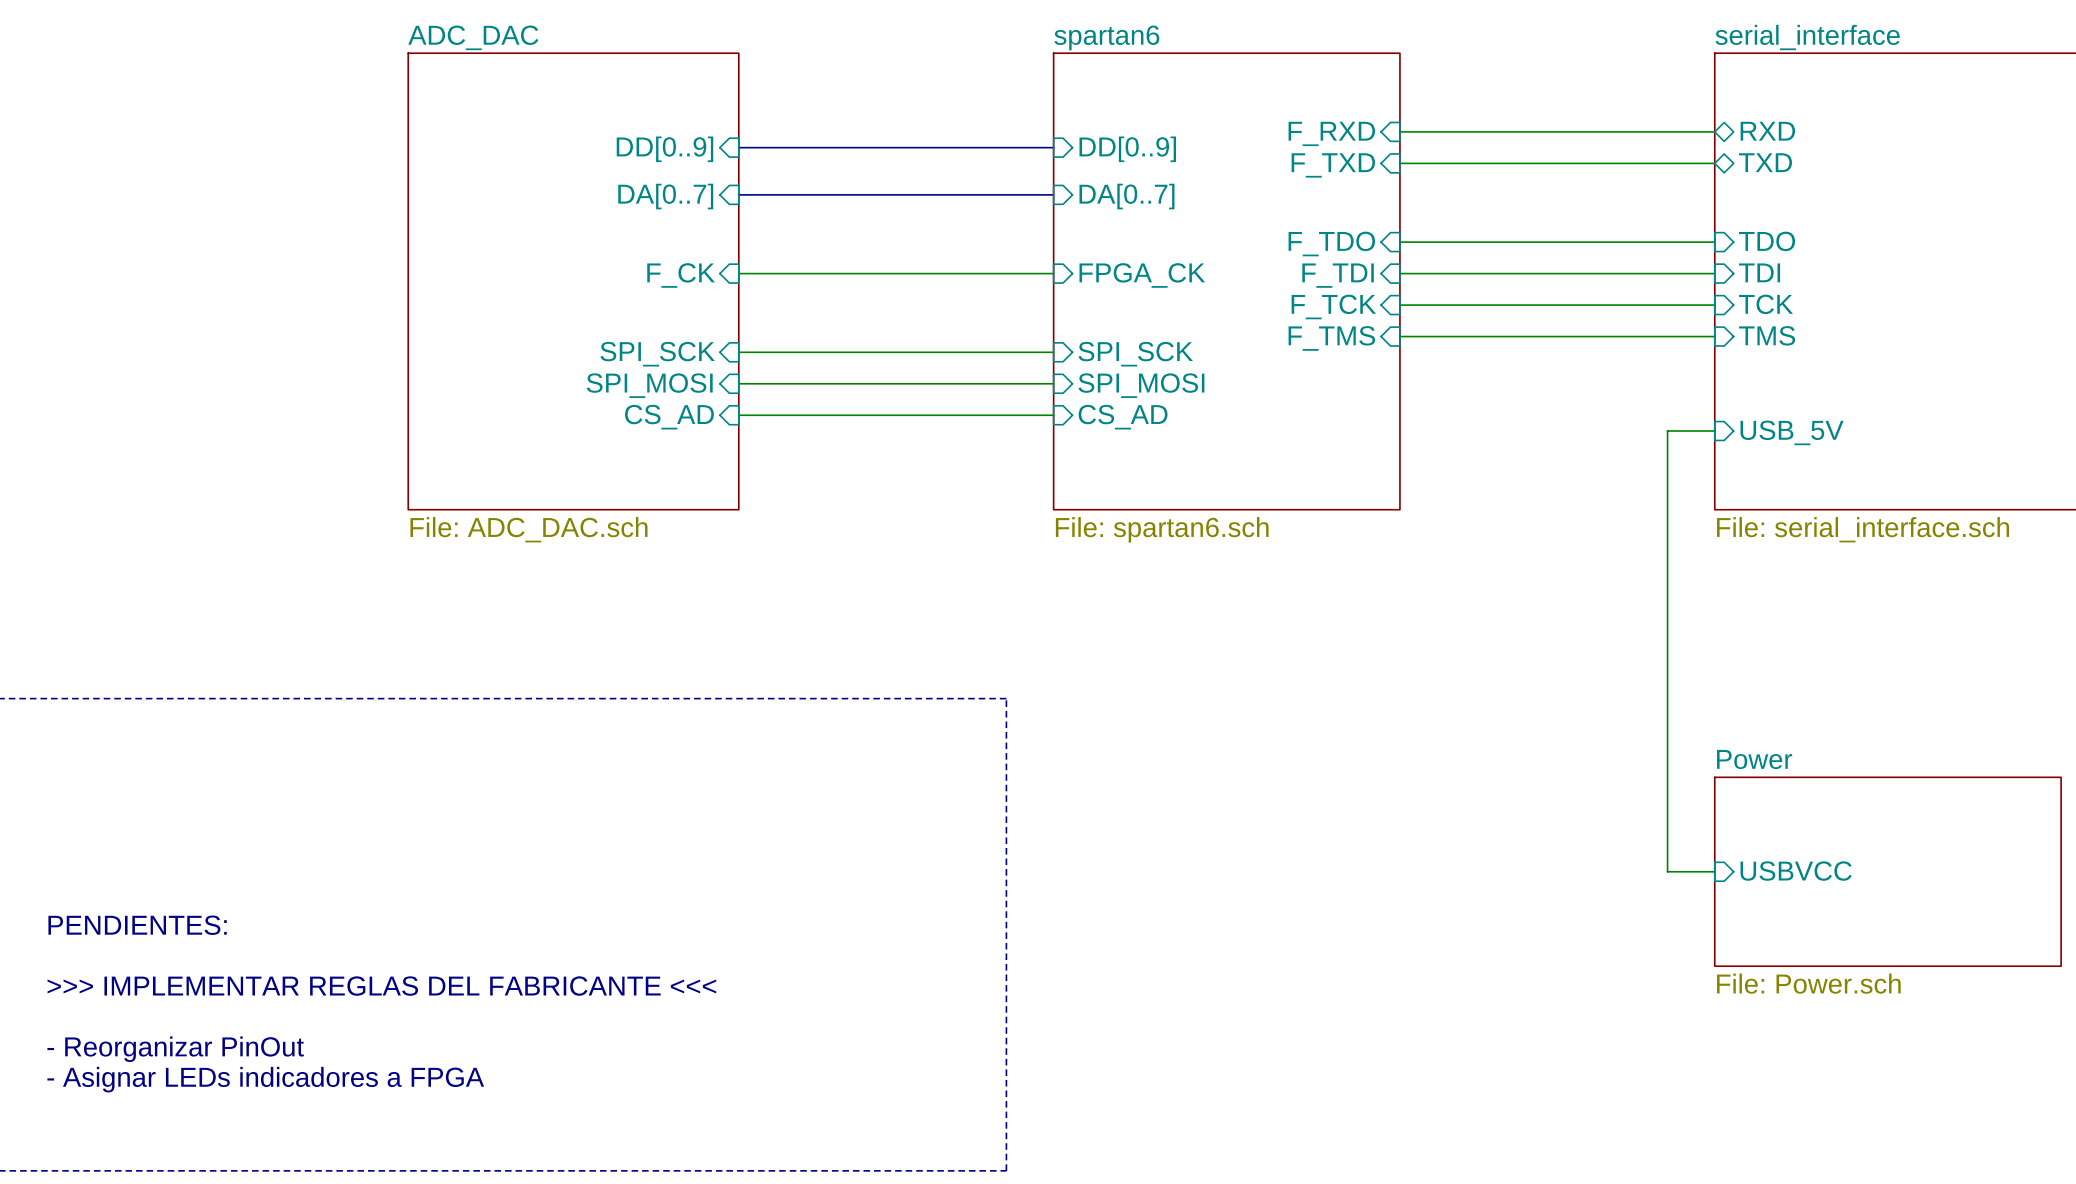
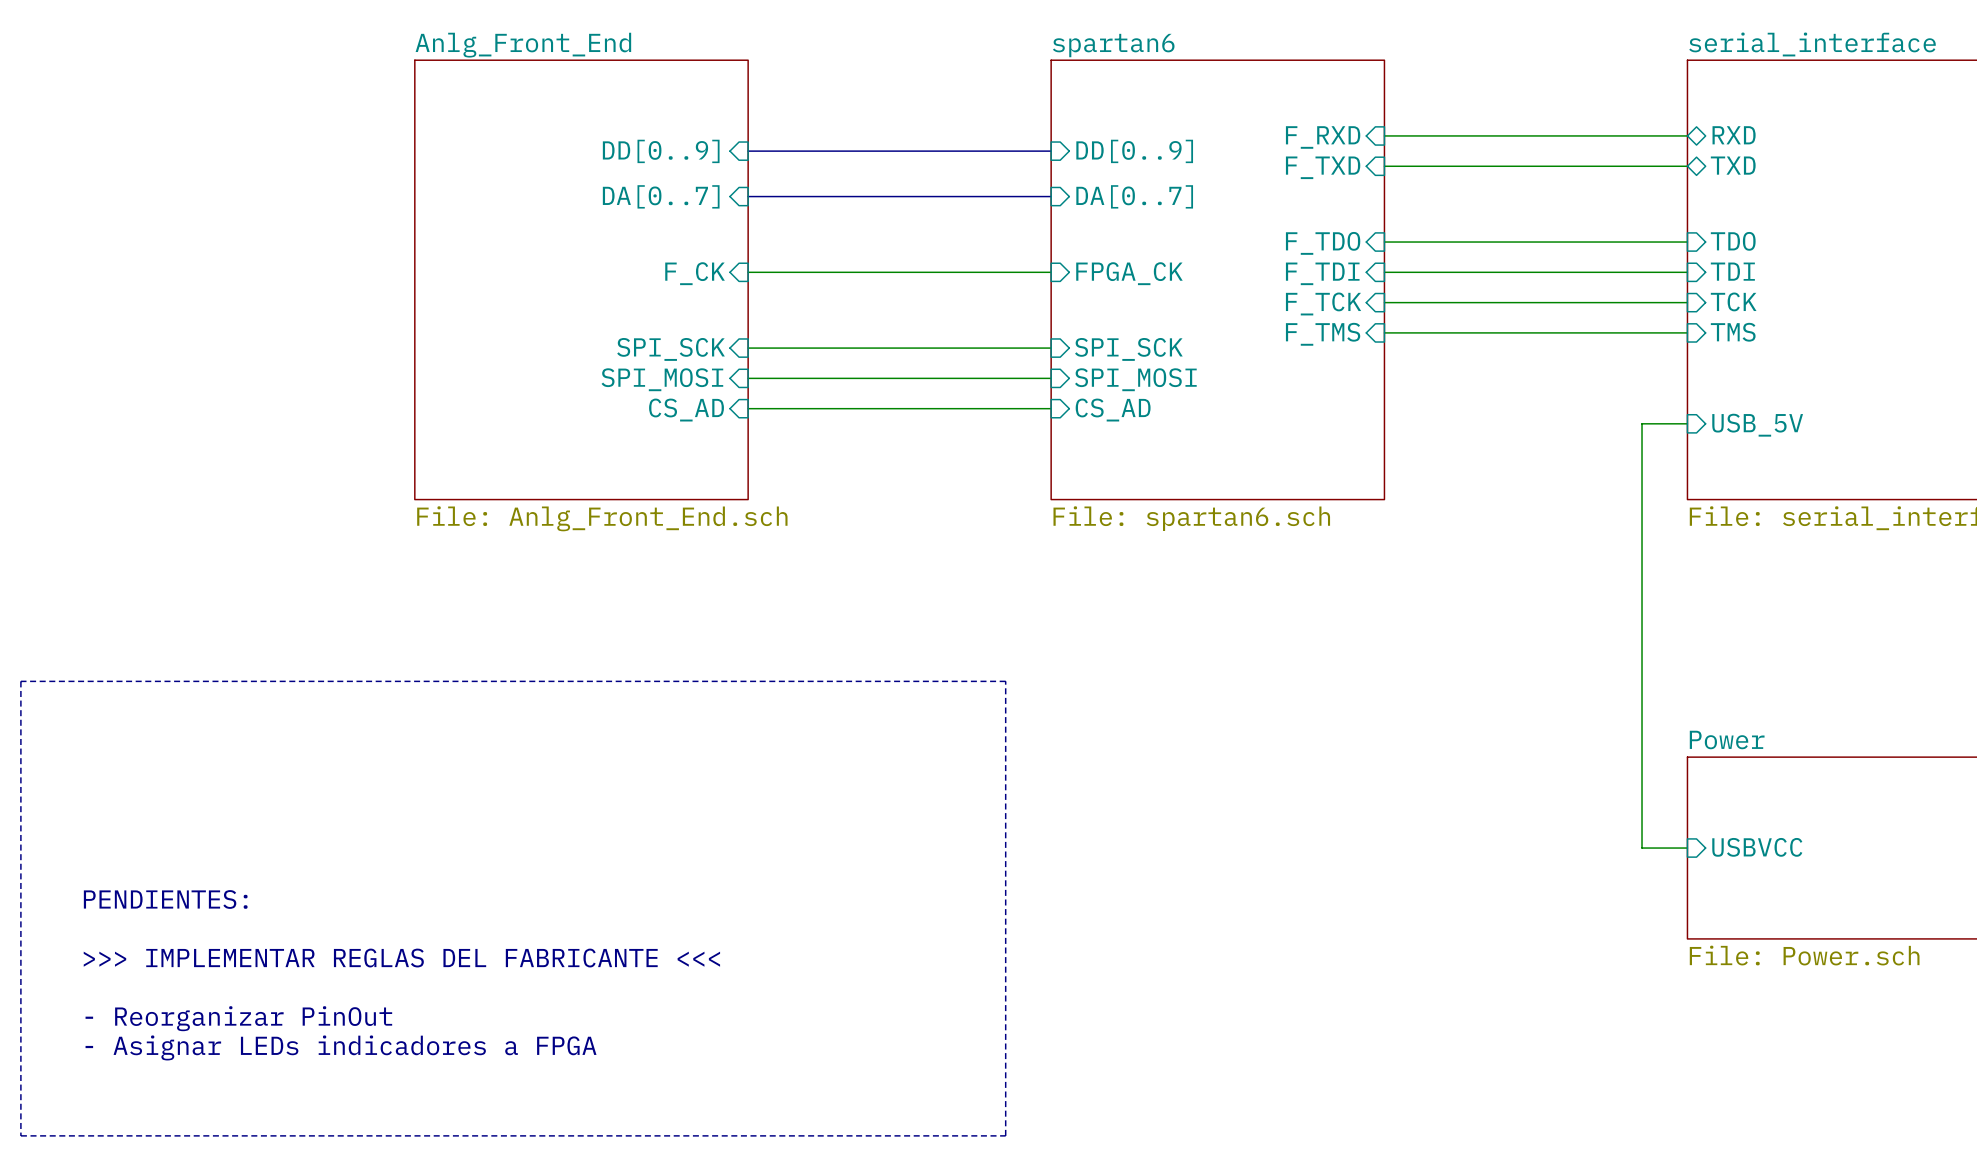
sheet Anlg_Front_End: none -> File: Anlg_Front_End.sch (581, 279)
sheet ADC_DAC: File: ADC_DAC.sch (573, 281) -> none

